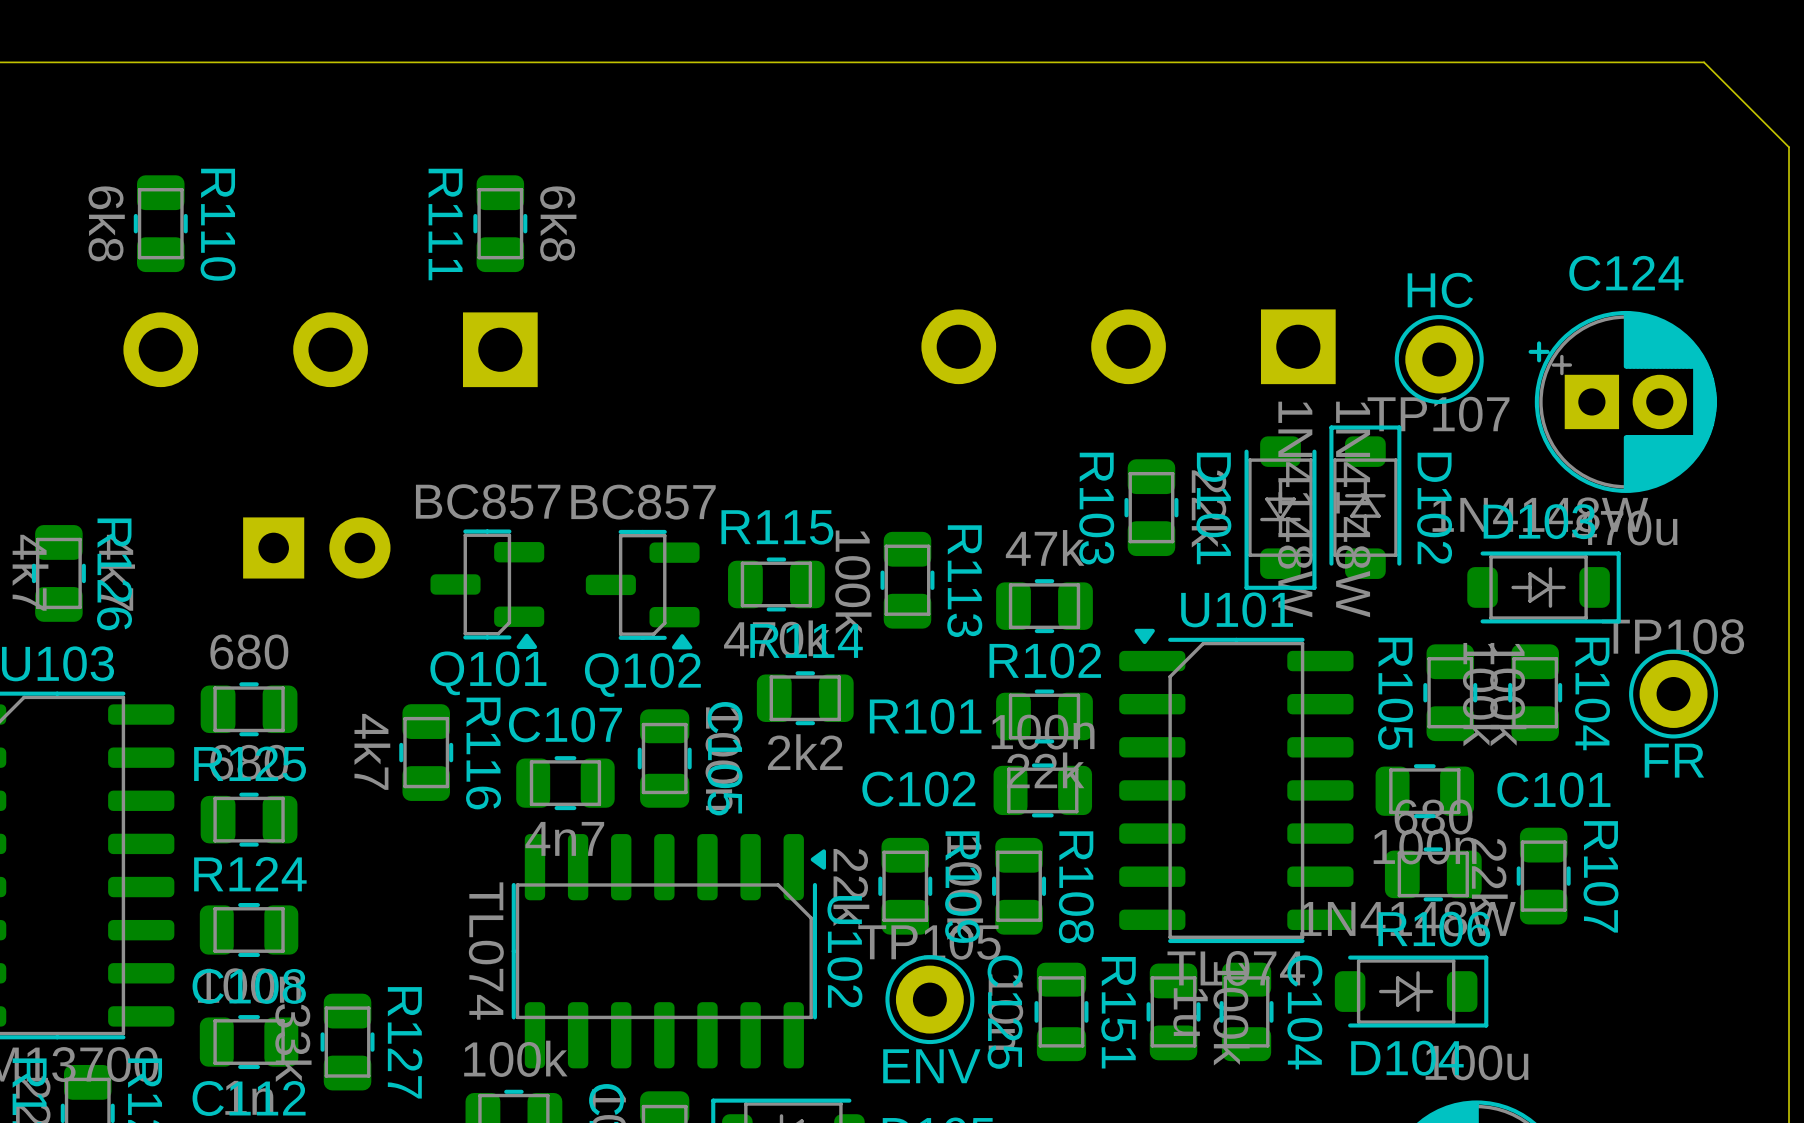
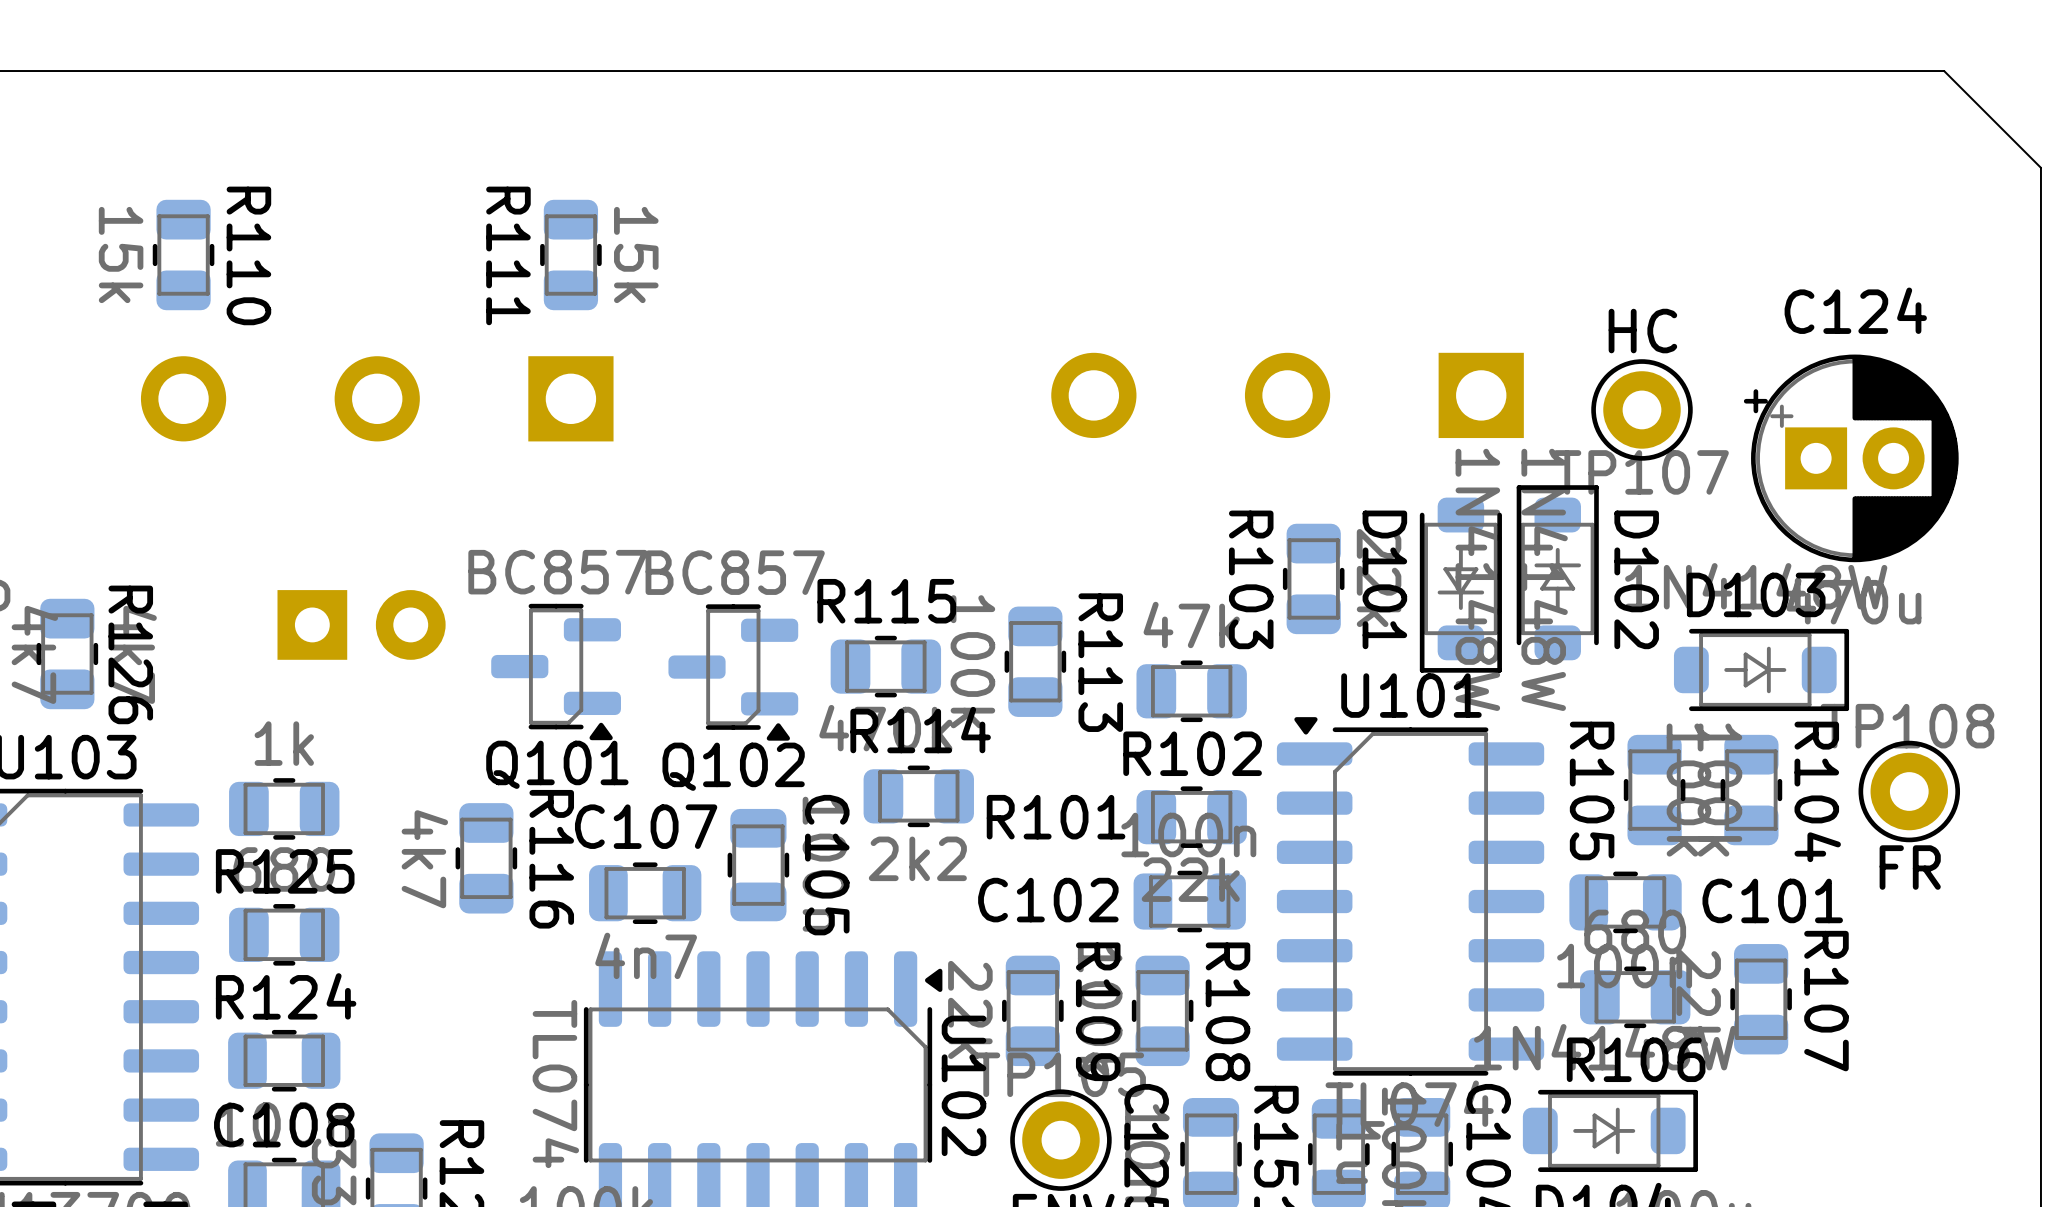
R110 value: 6k8 (106, 223) -> 15k (121, 255)
R111 value: 6k8 (558, 223) -> 15k (636, 255)
R125 value: 680 (249, 651) -> 1k (284, 743)

